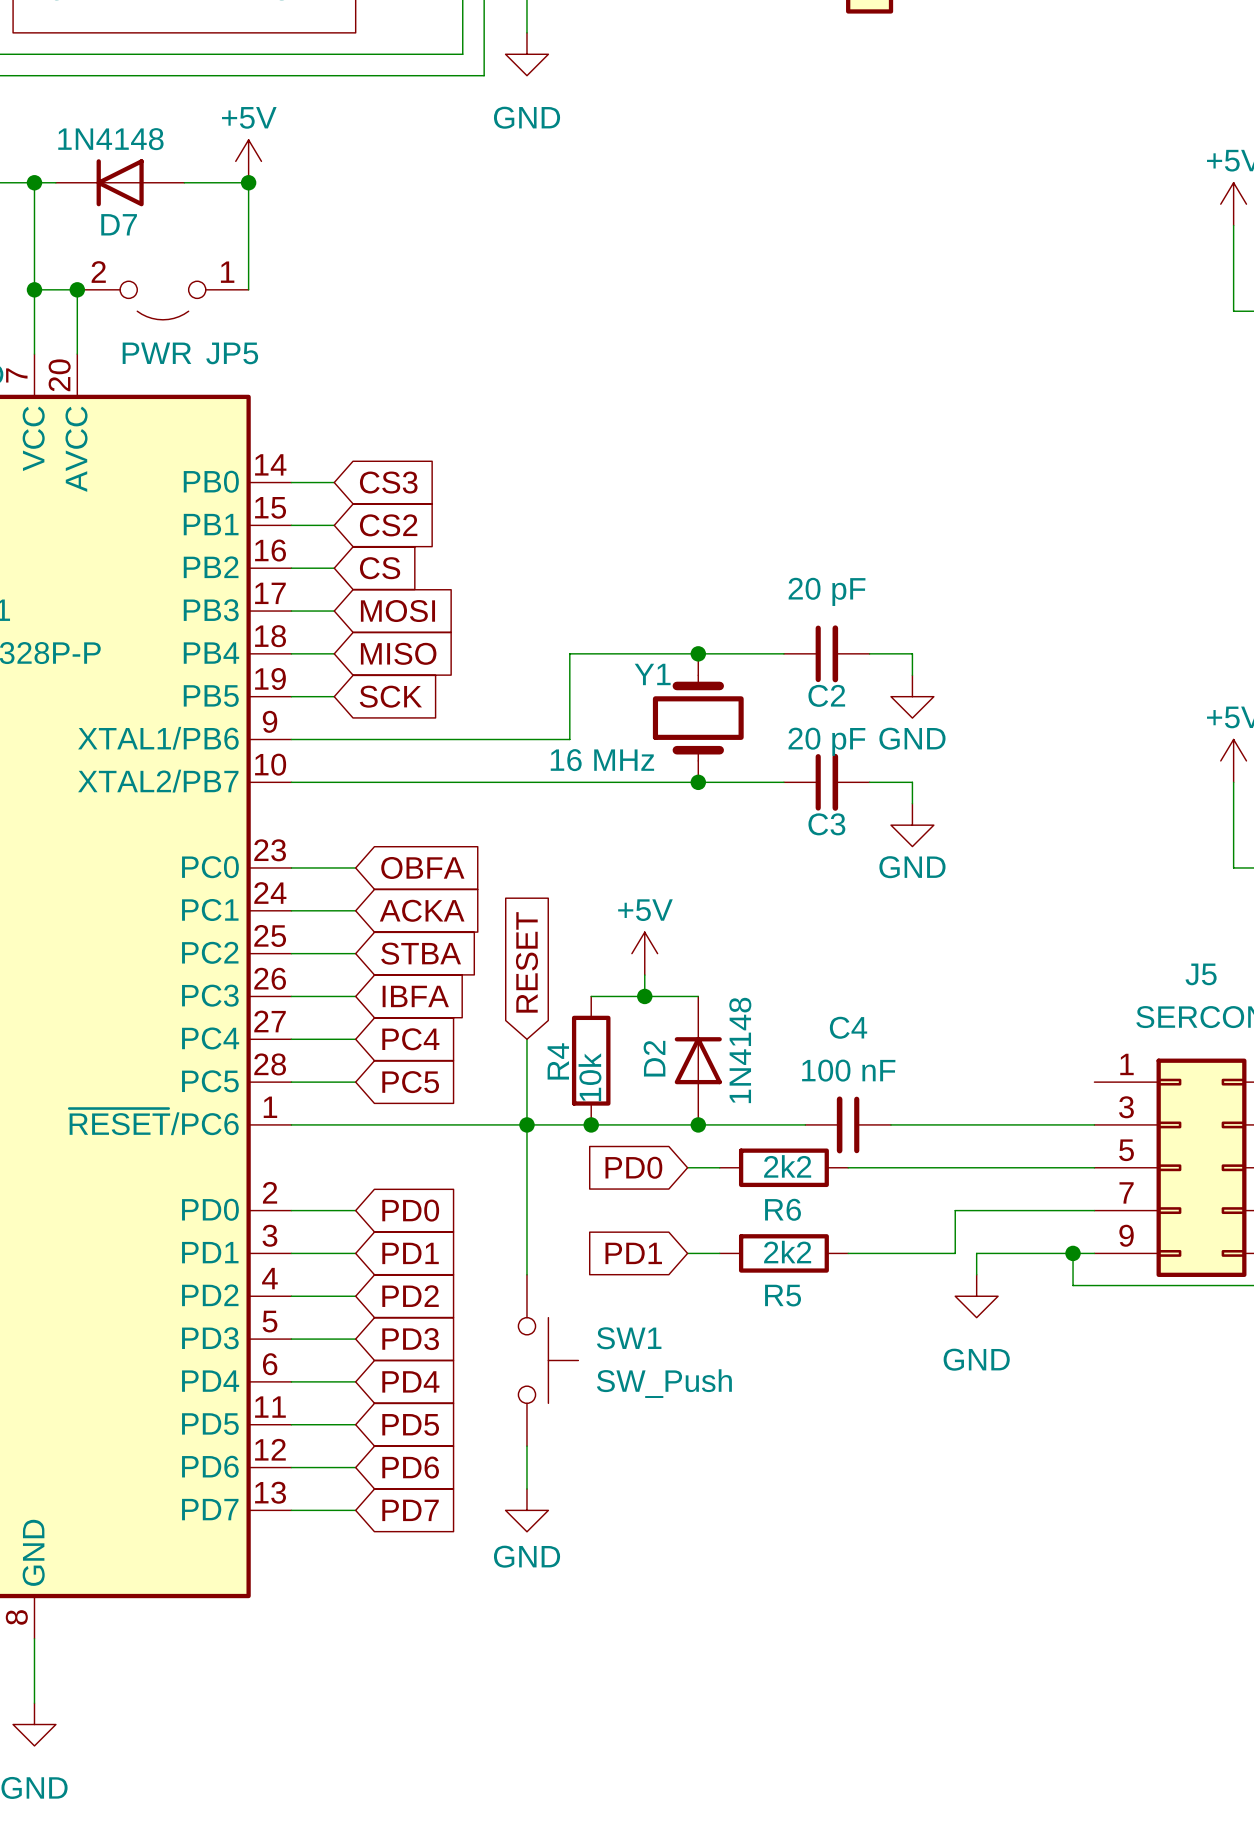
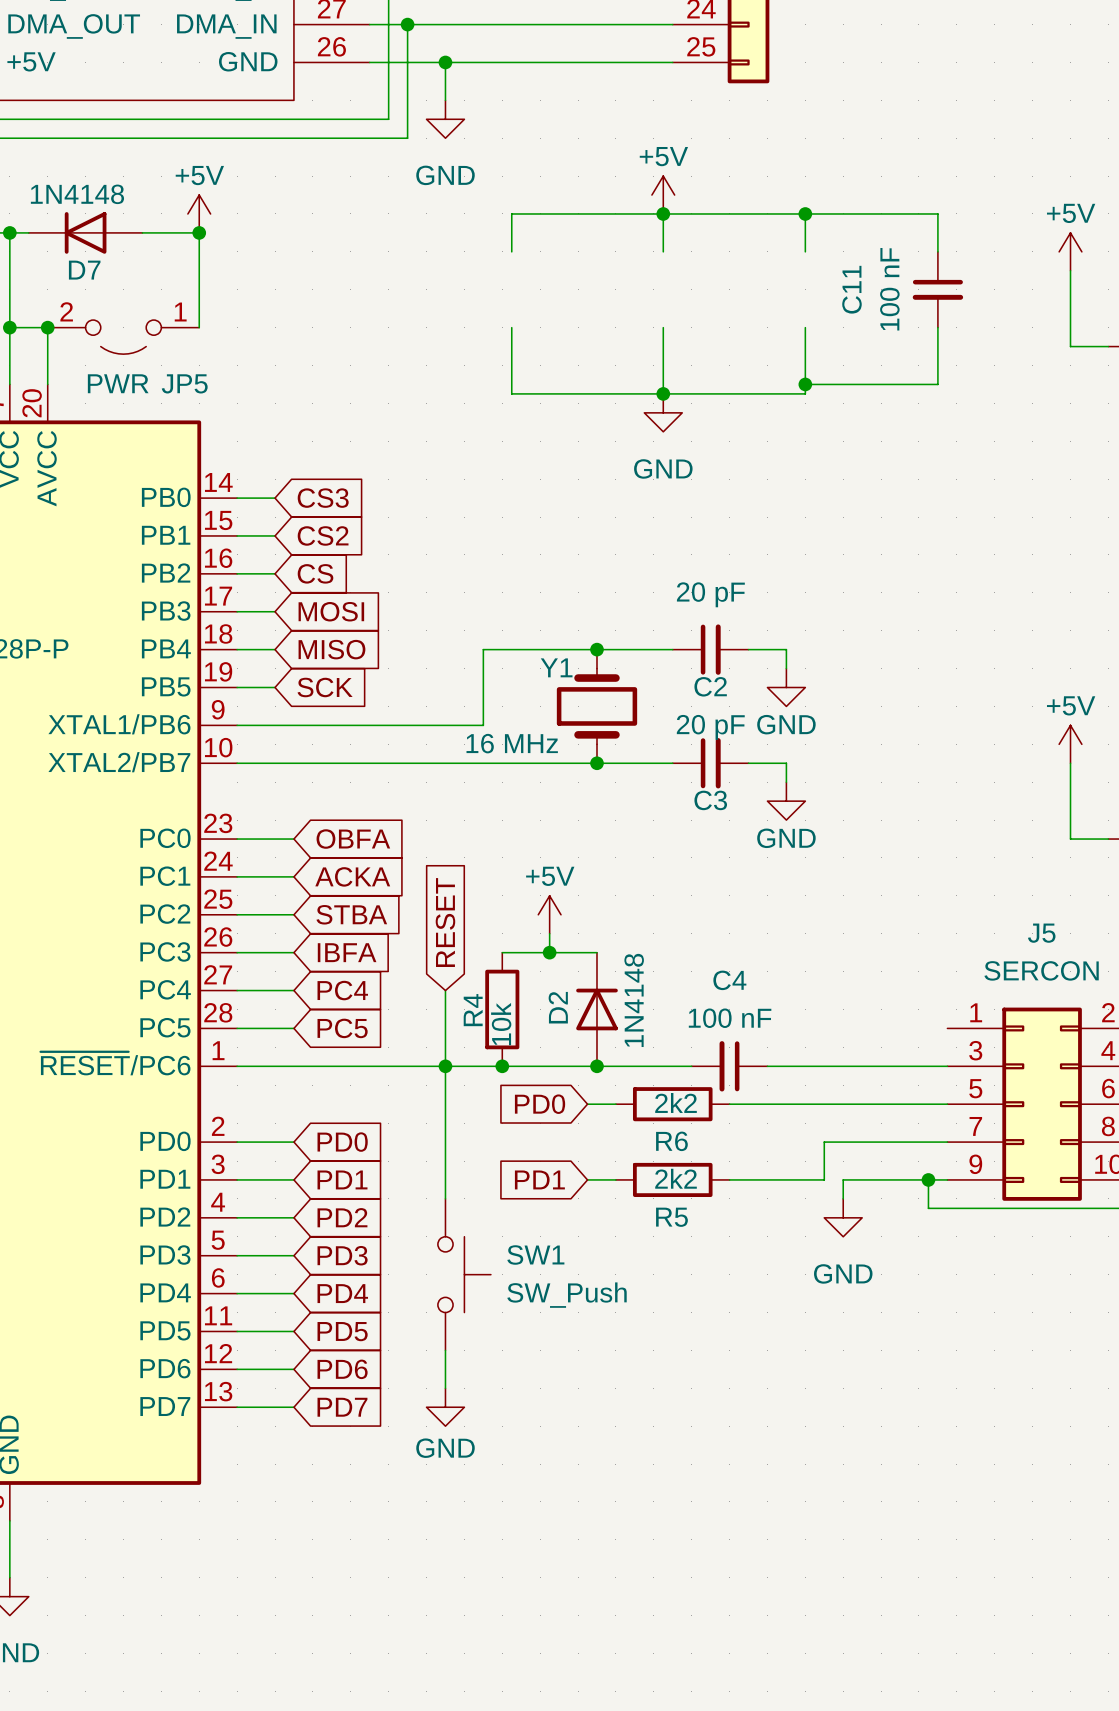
power symbol: none -> +5V (663, 195)
wire: none -> (663, 213) (663, 251)
junction: none -> (663, 213)
wire: none -> (805, 213) (805, 251)
junction: none -> (805, 213)
wire: none -> (511, 251) (511, 213) (937, 213) (937, 251)
C11: none -> 100 nF (937, 289)
wire: none -> (511, 327) (511, 393) (805, 393) (805, 327)
wire: none -> (663, 327) (663, 393)
wire: none -> (937, 327) (937, 384) (805, 384)
junction: none -> (805, 384)
junction: none -> (663, 393)
power symbol: none -> GND (663, 412)

